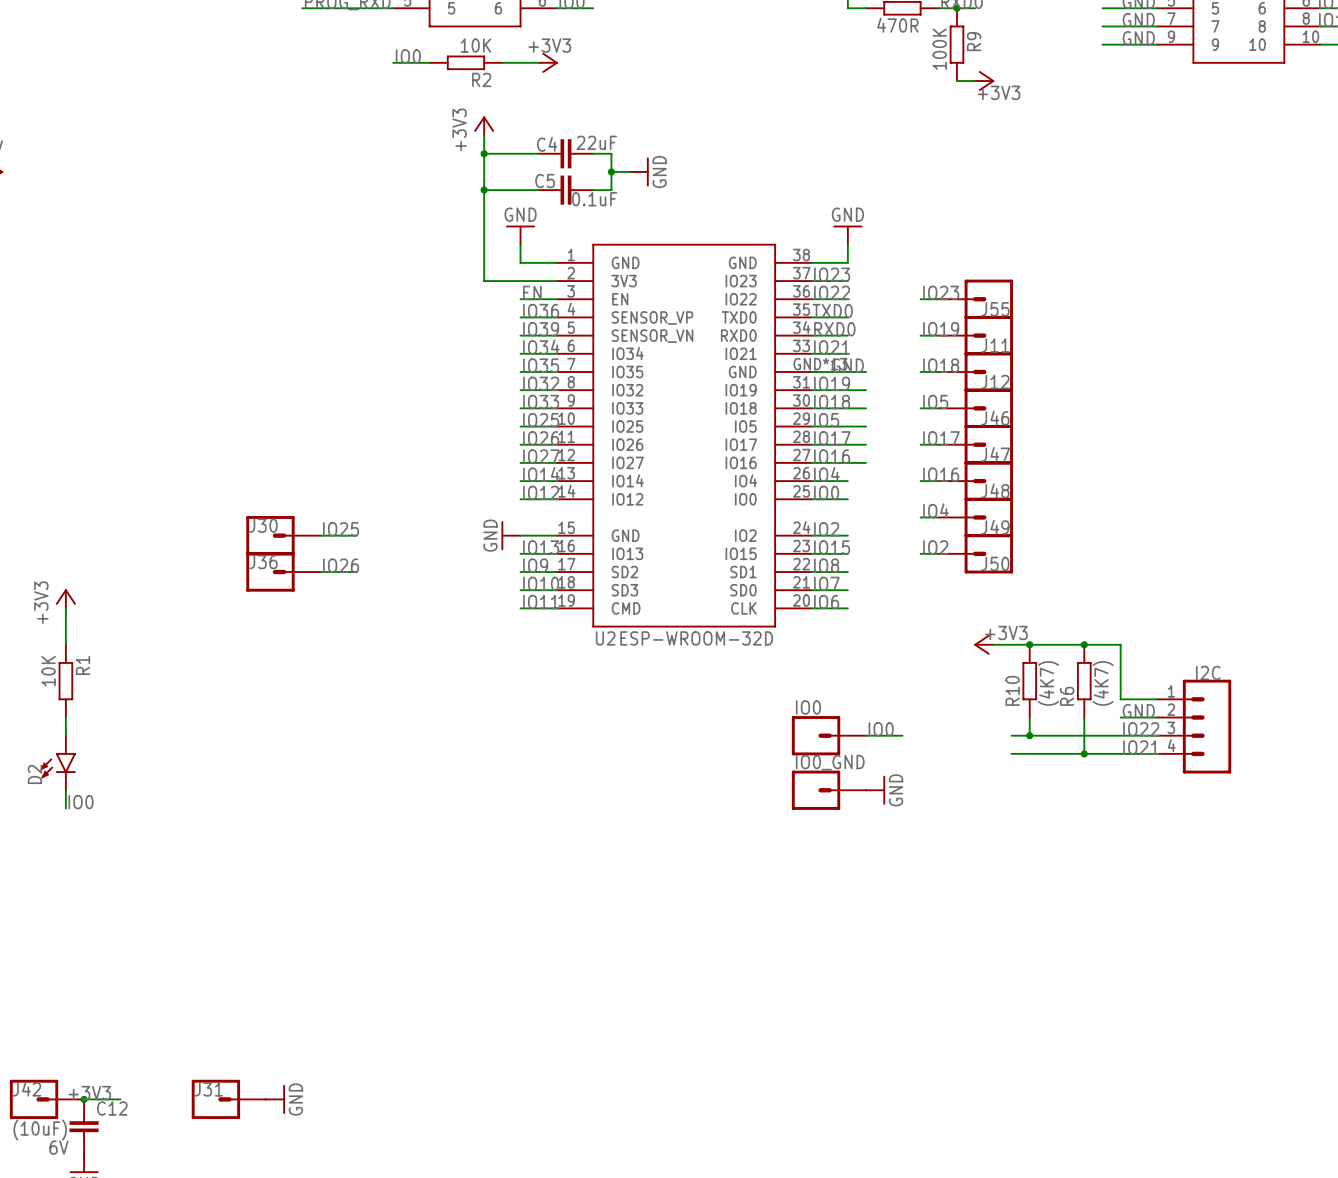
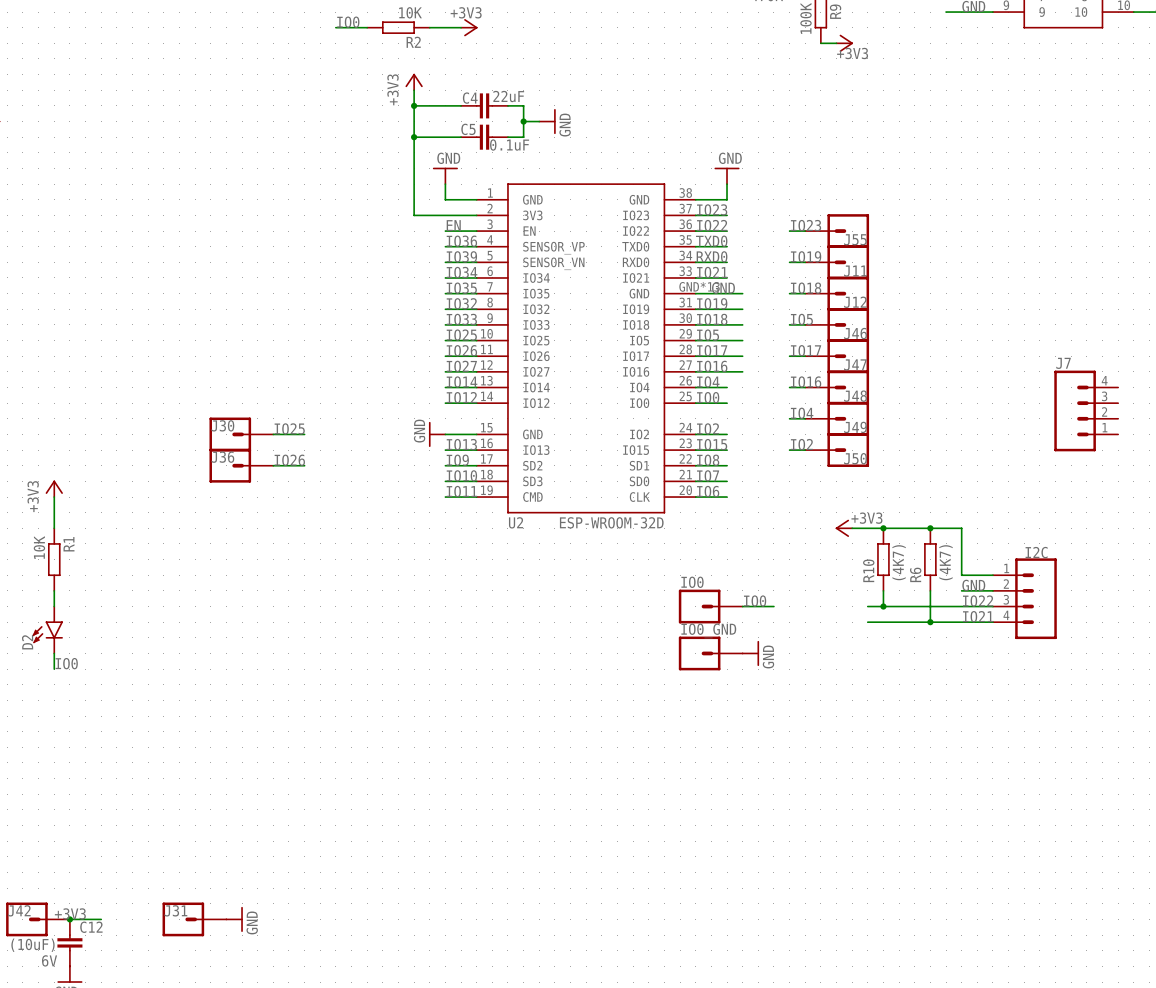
J7: none -> (1086, 410)

